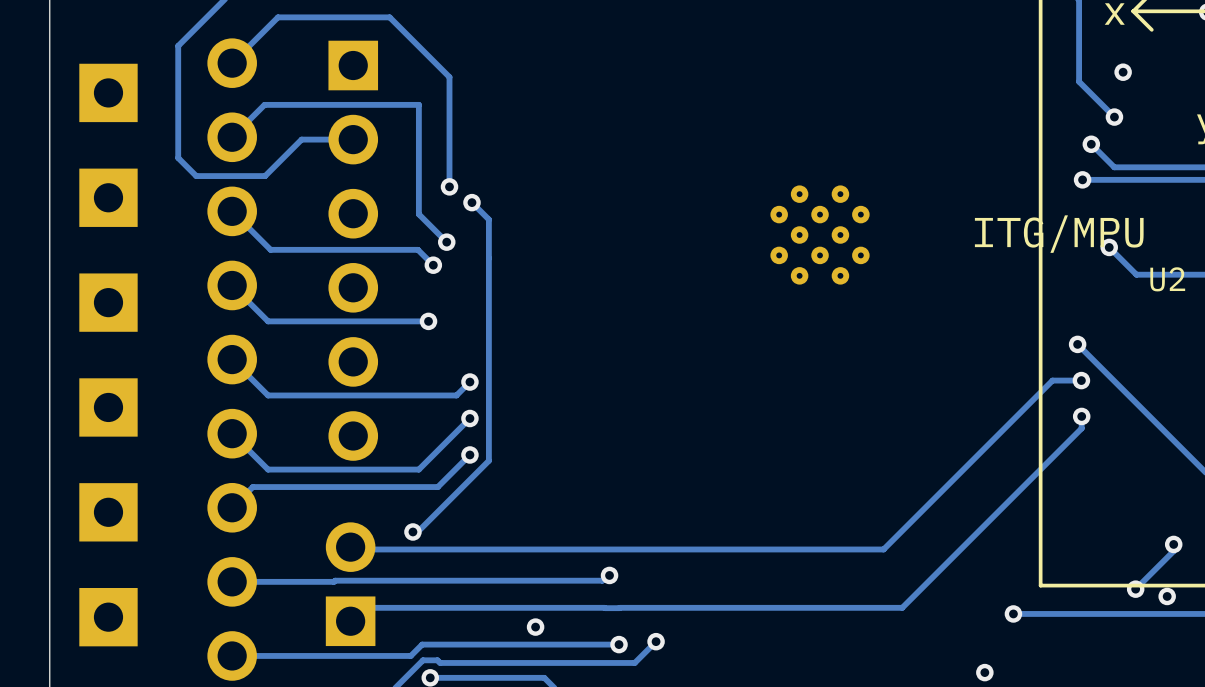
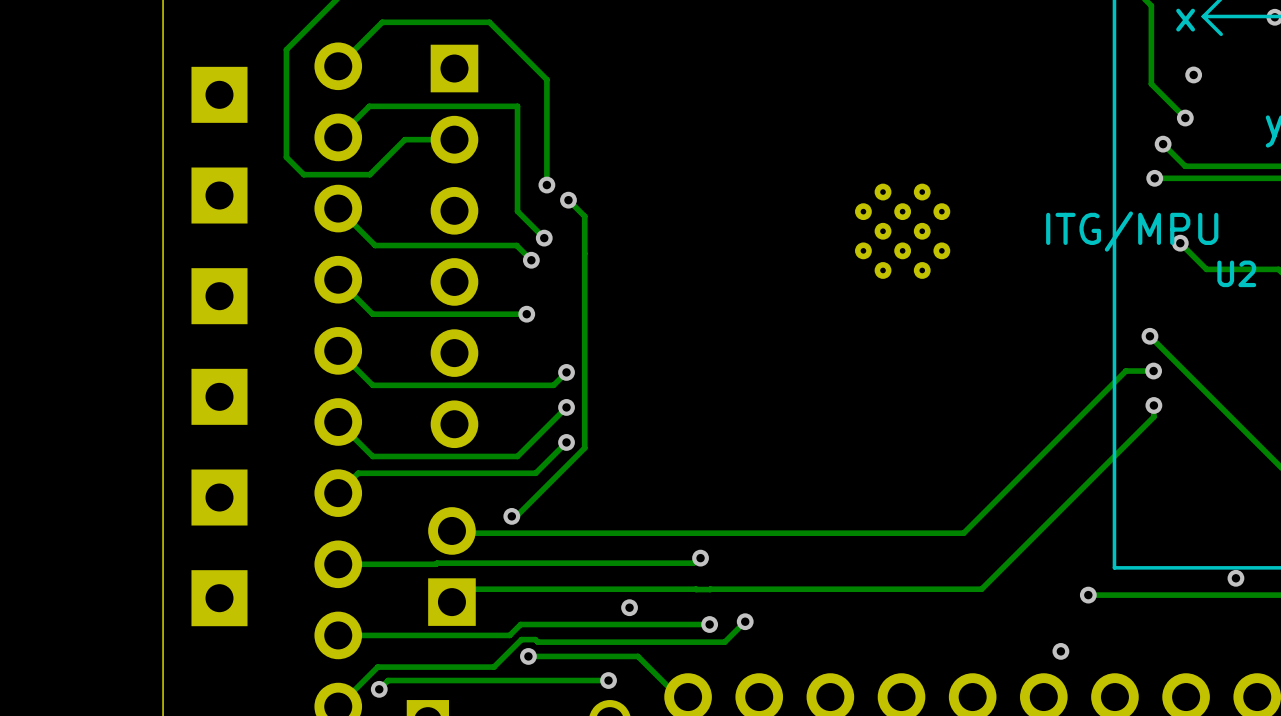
track: (1173, 544) (1173, 551) (1135, 589) -> none
via: (1173, 544) -> none
via: (1135, 589) -> none

